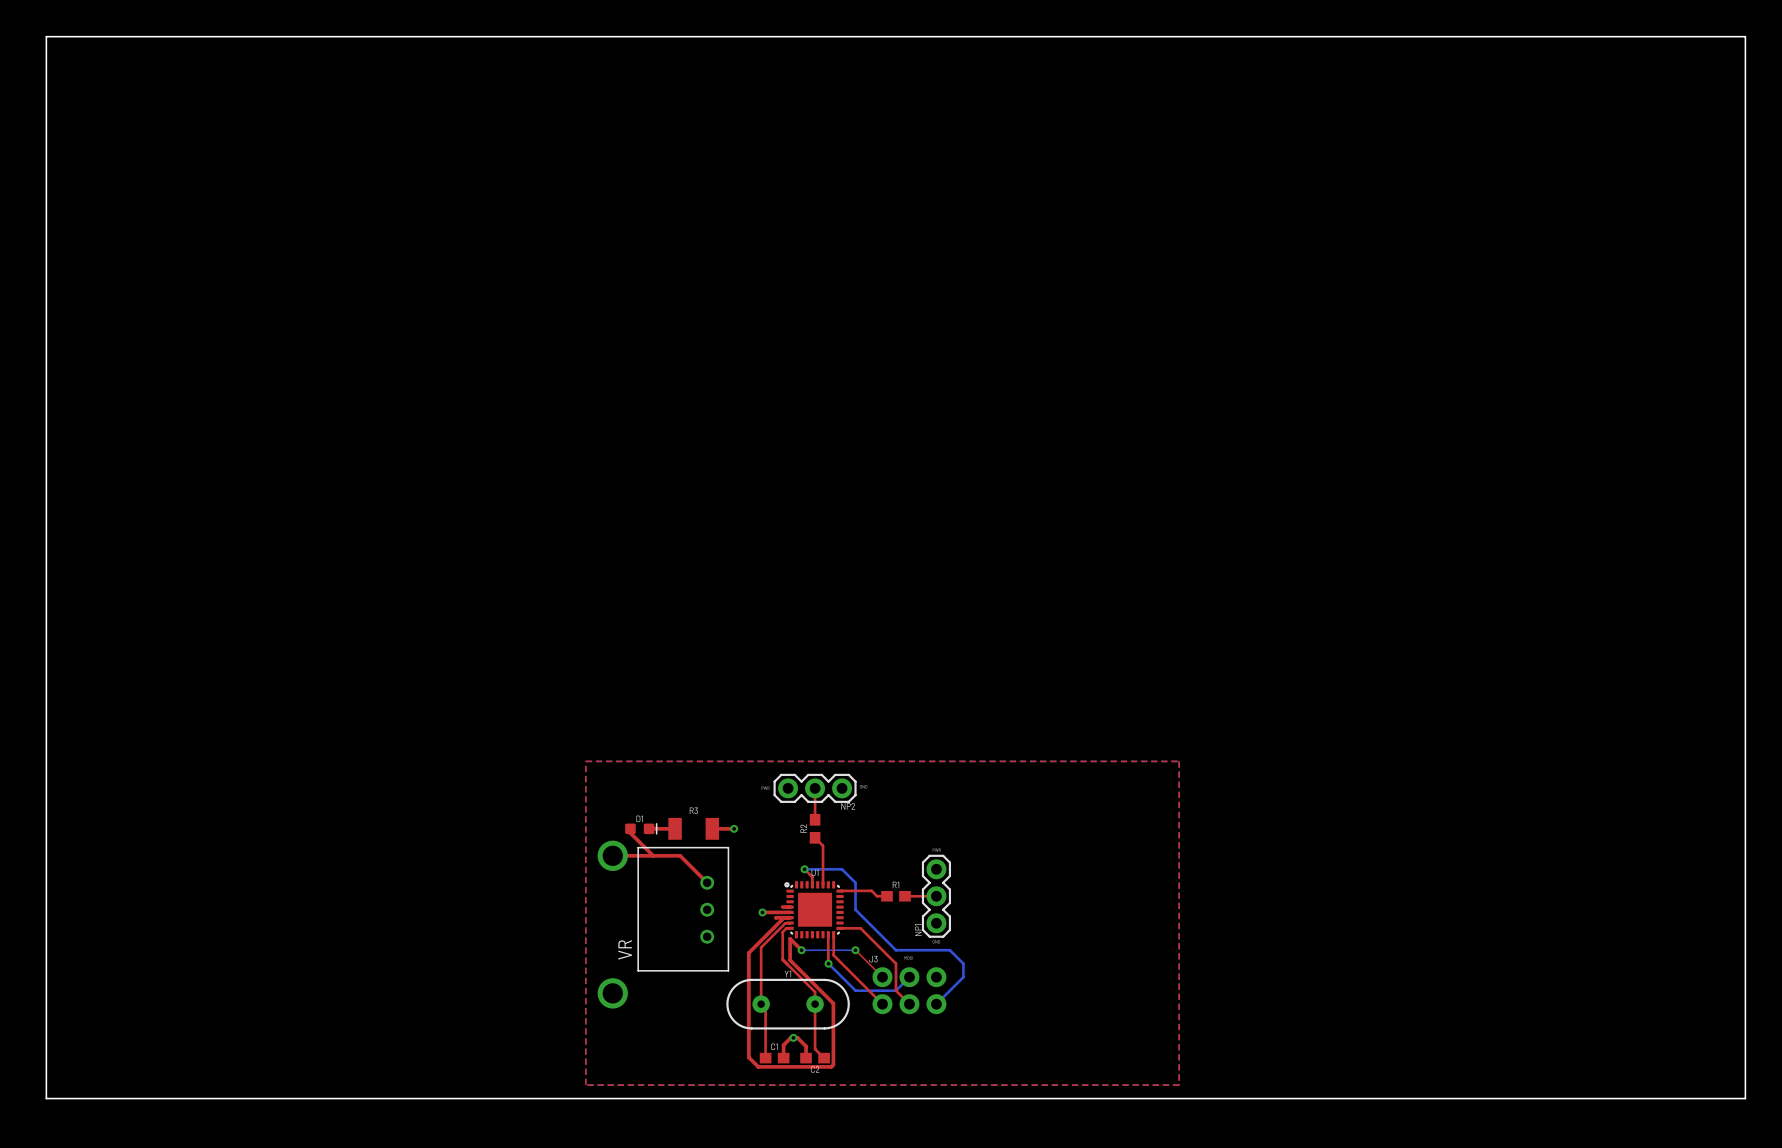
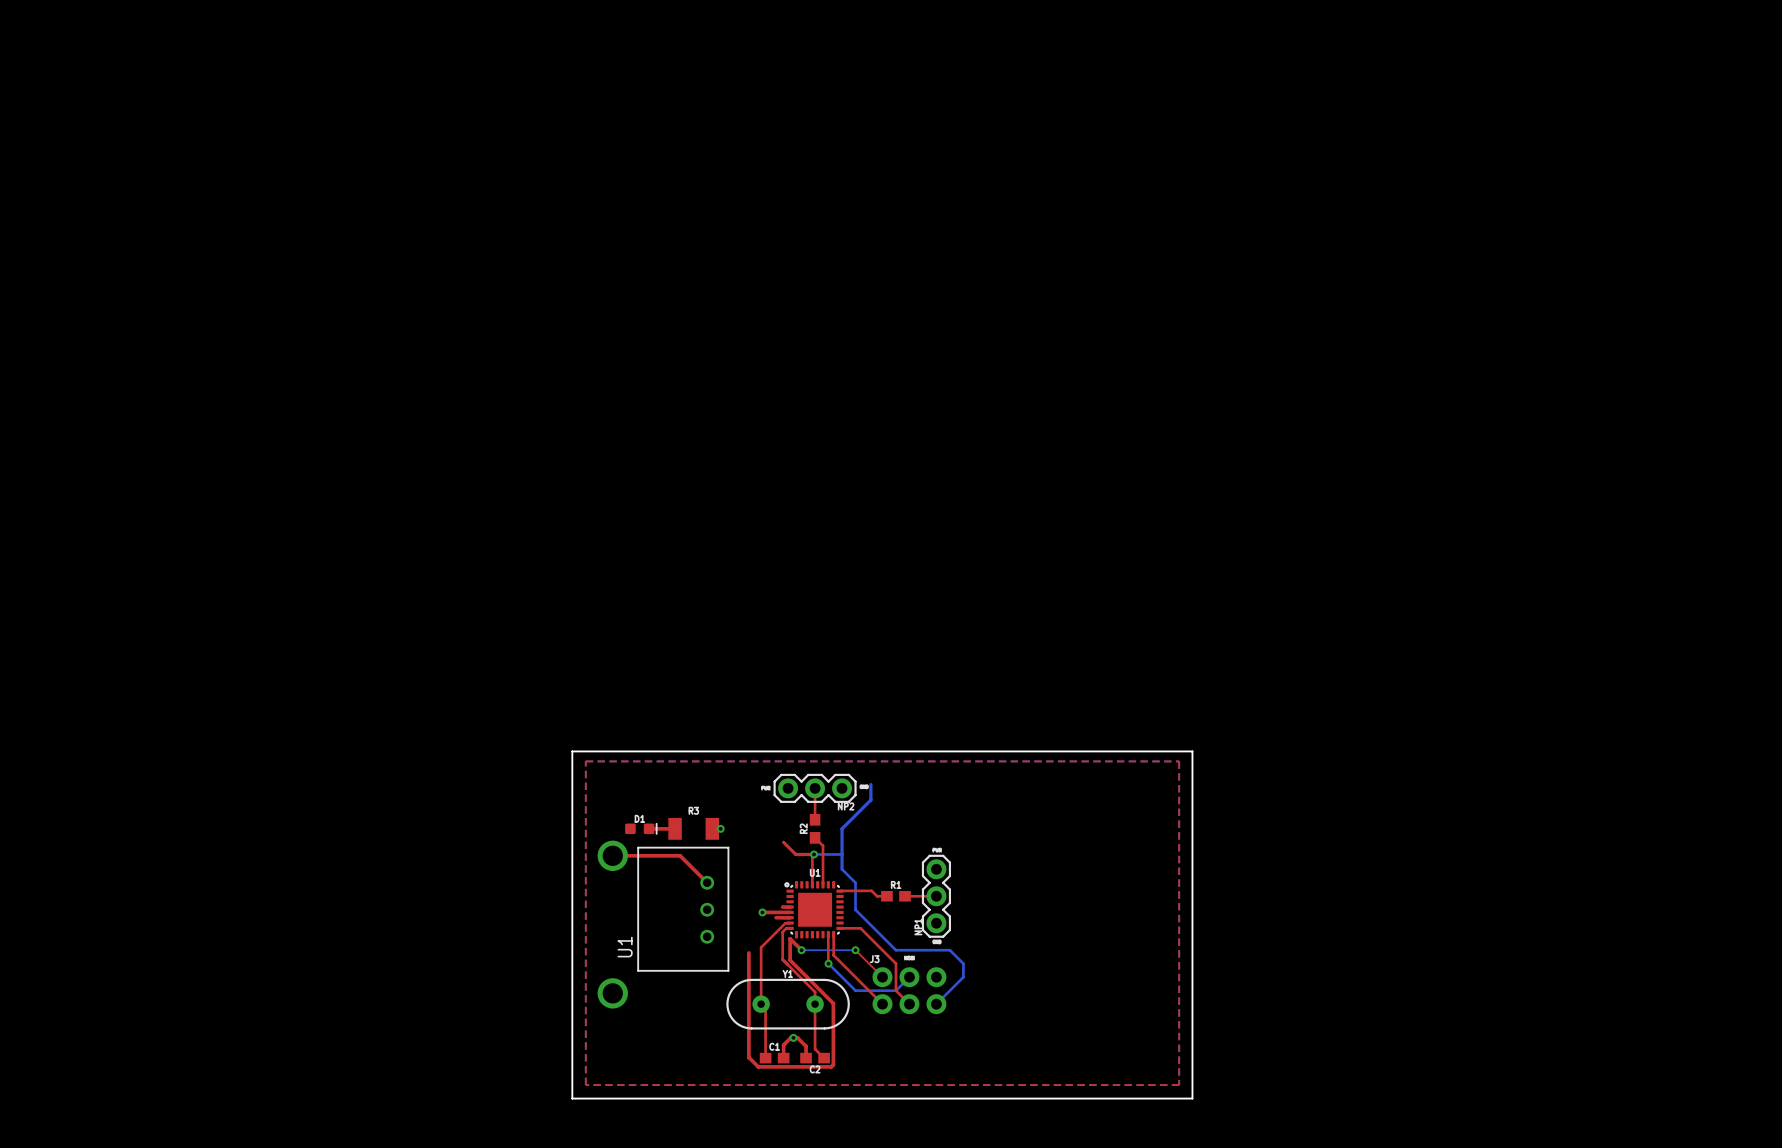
top track: (630, 828) (630, 833) (653, 855) -> none
top track: (720, 828) (734, 828) -> none
via position: (734, 828) -> (720, 828)
bottom track: none -> (814, 854) (842, 854)
top track: (804, 869) (812, 877) -> (783, 842) (795, 854) (814, 854) (812, 852) (812, 877)
bottom track: (804, 869) (842, 869) -> (870, 784) (870, 799) (842, 828) (842, 869)
via position: (804, 869) -> (814, 854)
top track: (790, 917) (783, 917) (748, 952) -> none
VR name: VR (625, 949) -> U1 (625, 947)
board edge: (572, 1098) (46, 1098) (46, 36) (1745, 36) (1745, 1098) (1192, 1098) -> (572, 1098) (572, 751) (1192, 751) (1192, 1098)

